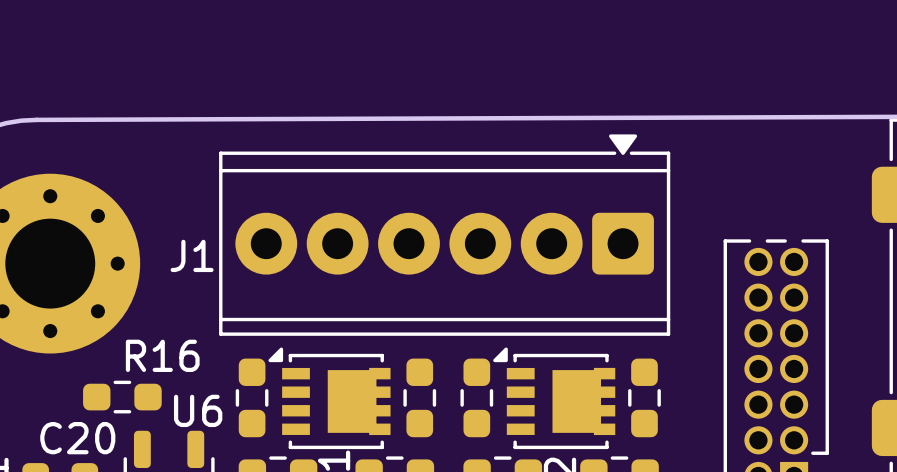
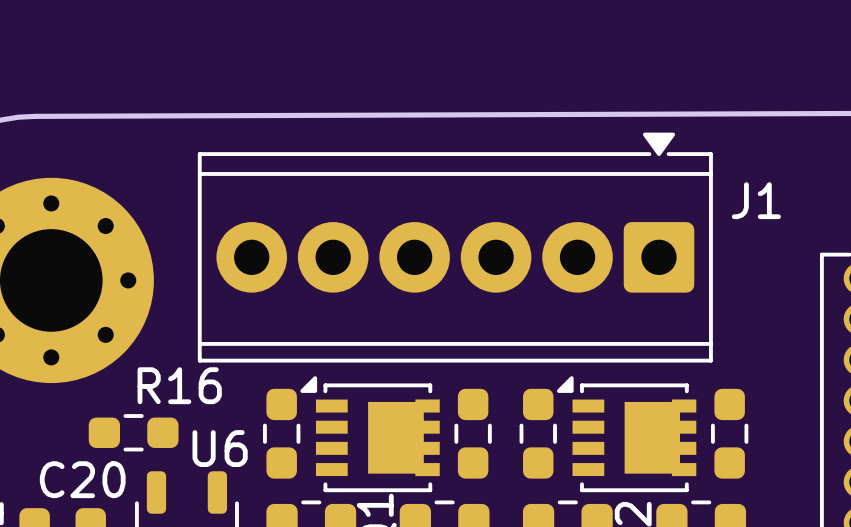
J1 position: (444, 235) -> (455, 247)
J1 name position: J1 (192, 255) -> J1 (756, 200)

